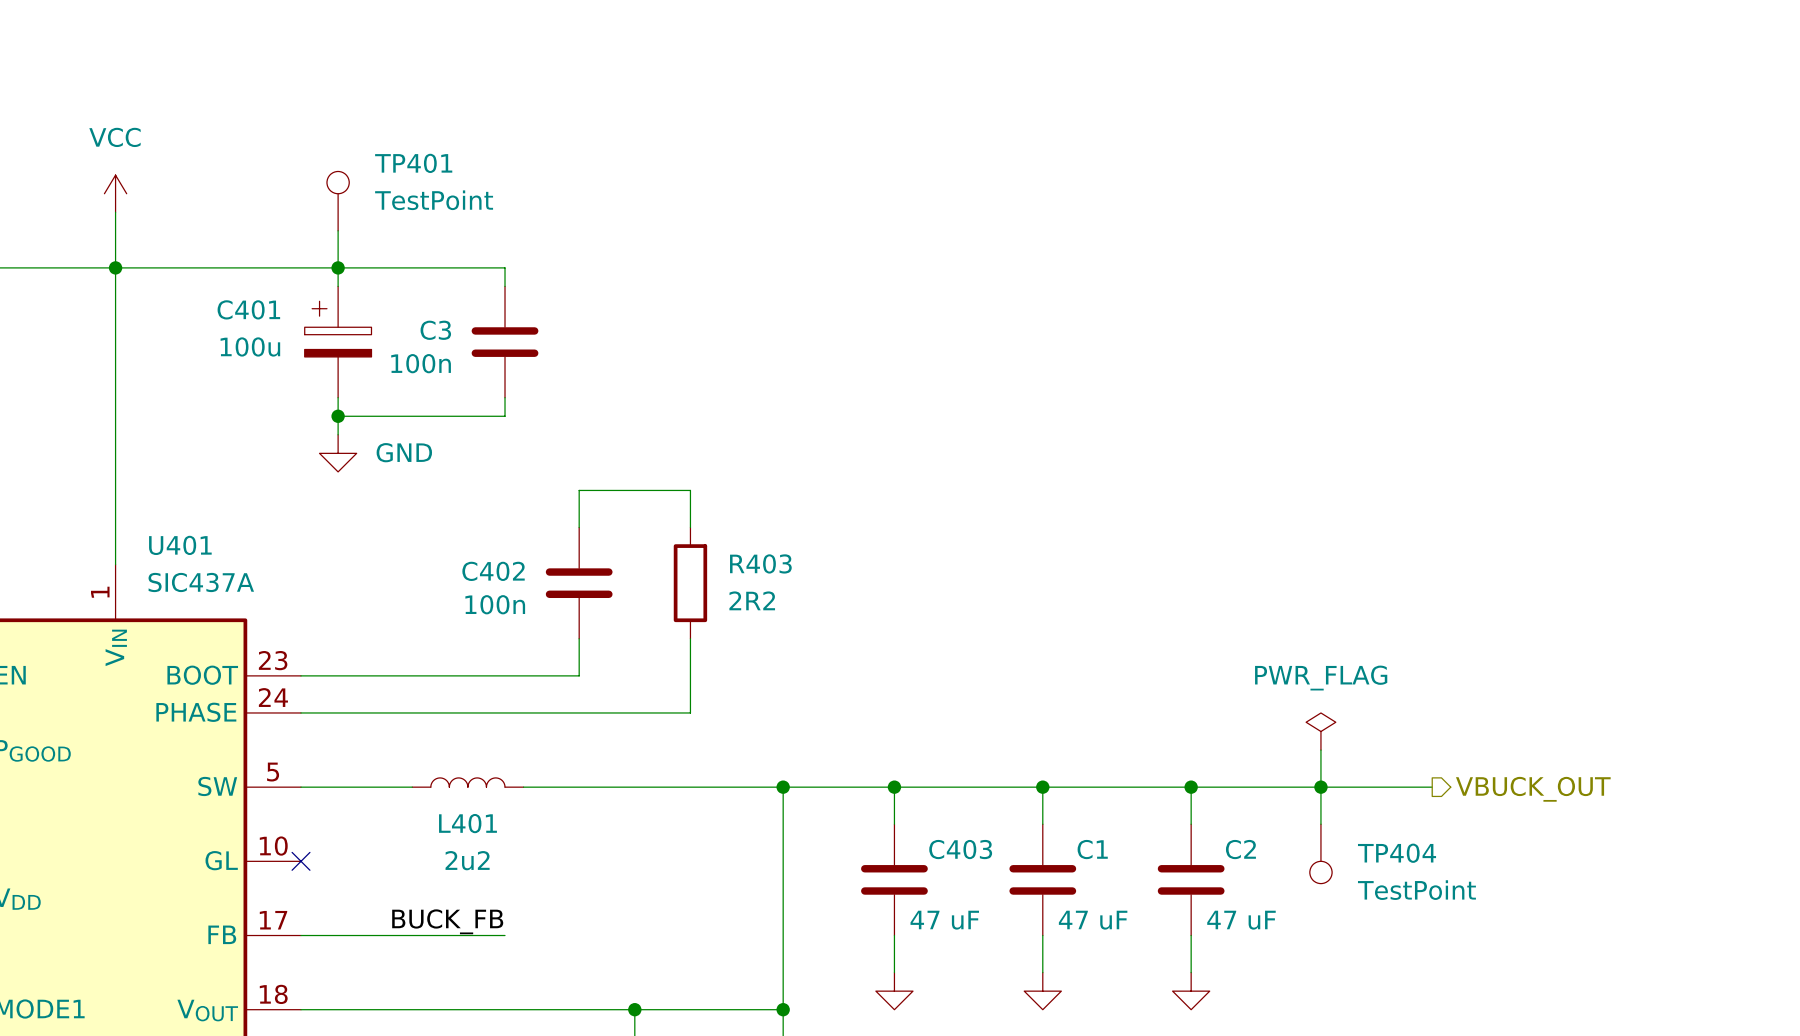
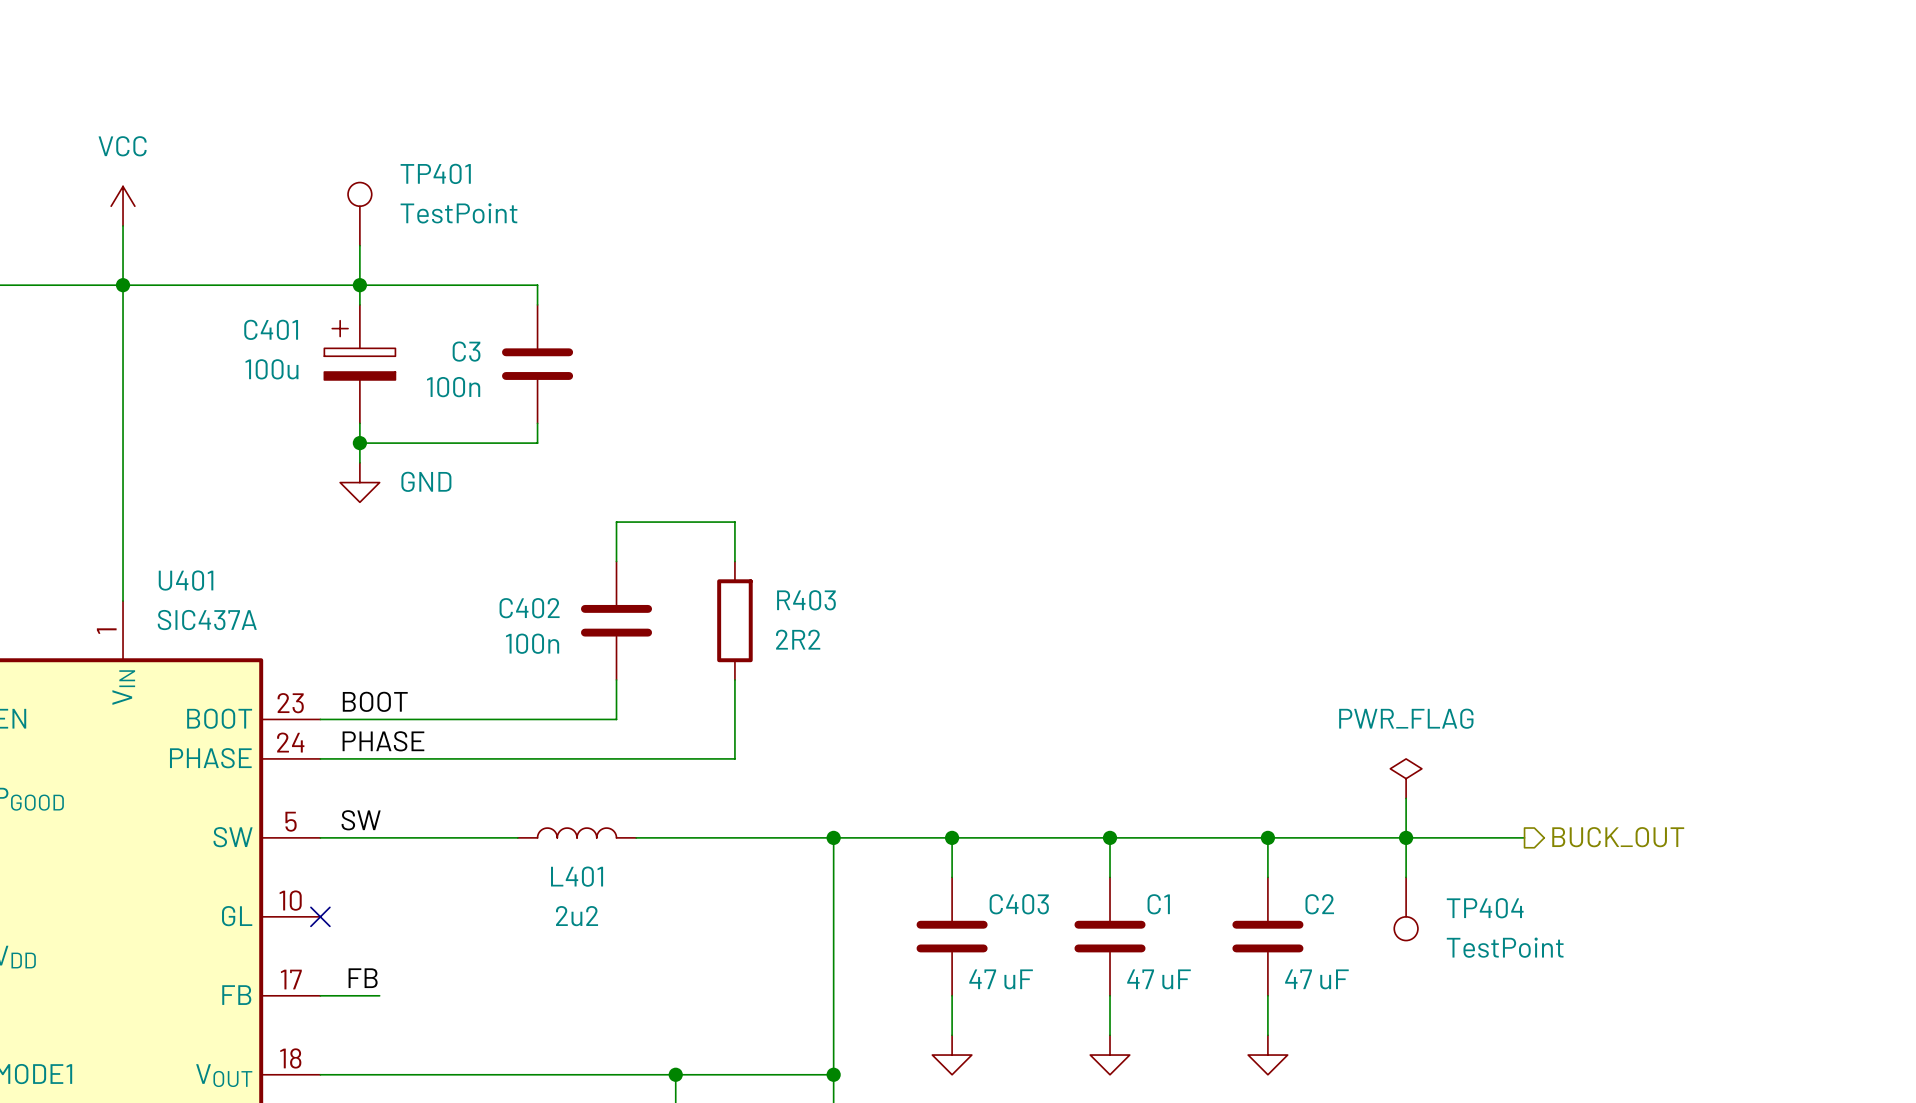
label: none -> BOOT (375, 701)
label: none -> PHASE (383, 741)
label: none -> SW (361, 820)
L401 position: (467, 782) -> (577, 832)
wire: (523, 787) (597, 787) -> (438, 837) (517, 837)
hierarchical label: VBUCK_OUT (1533, 789) -> BUCK_OUT (1618, 837)
label: none -> FB (363, 978)
label: BUCK_FB (447, 921) -> none
wire: (356, 935) (505, 935) -> none

